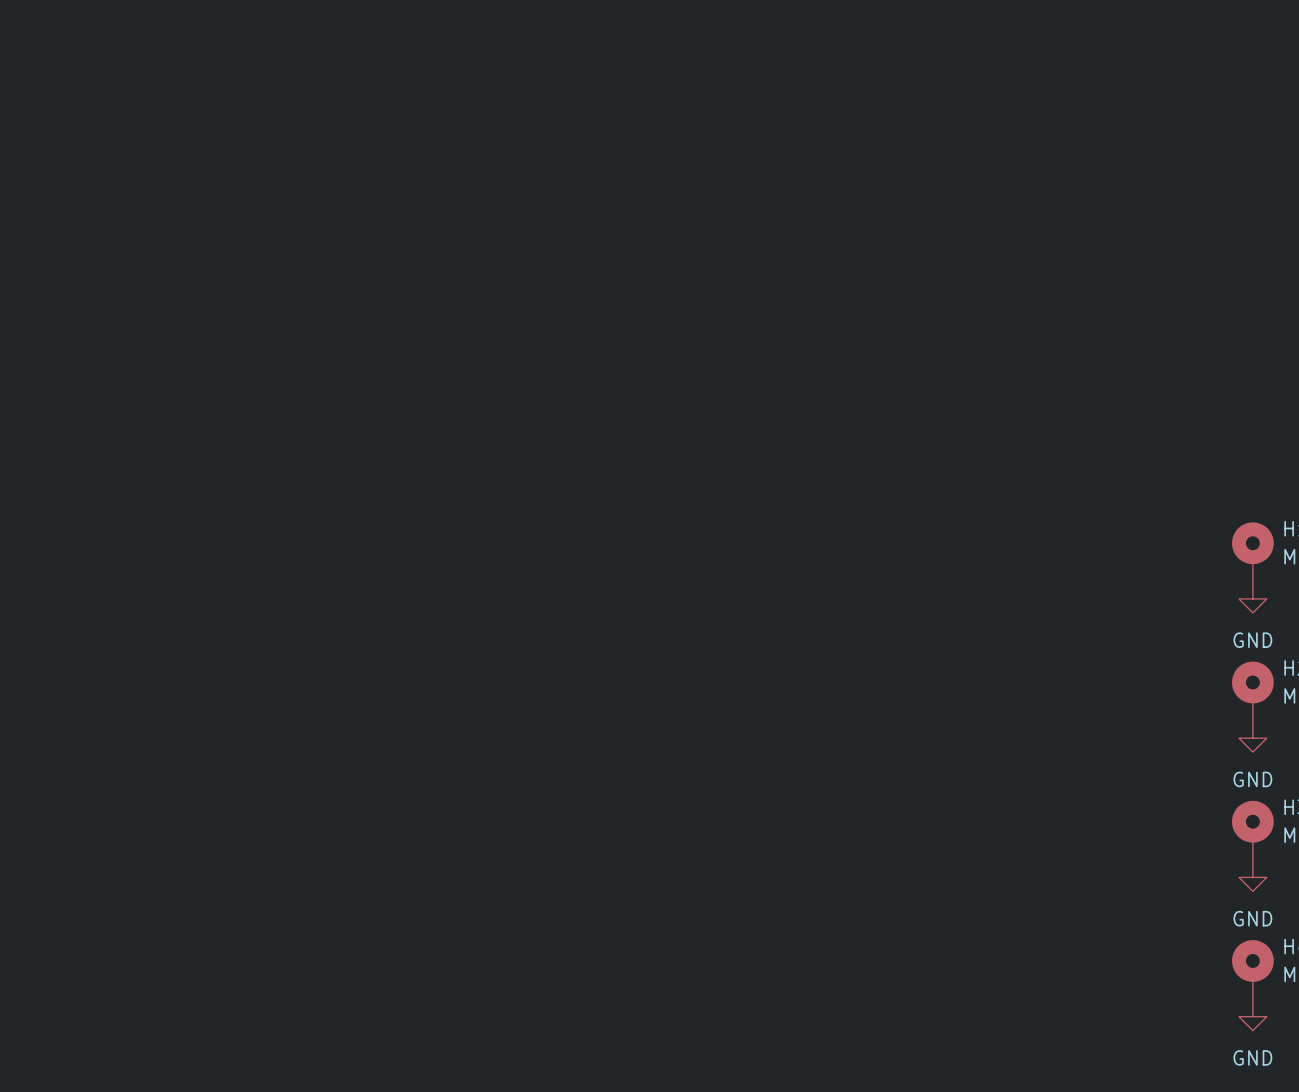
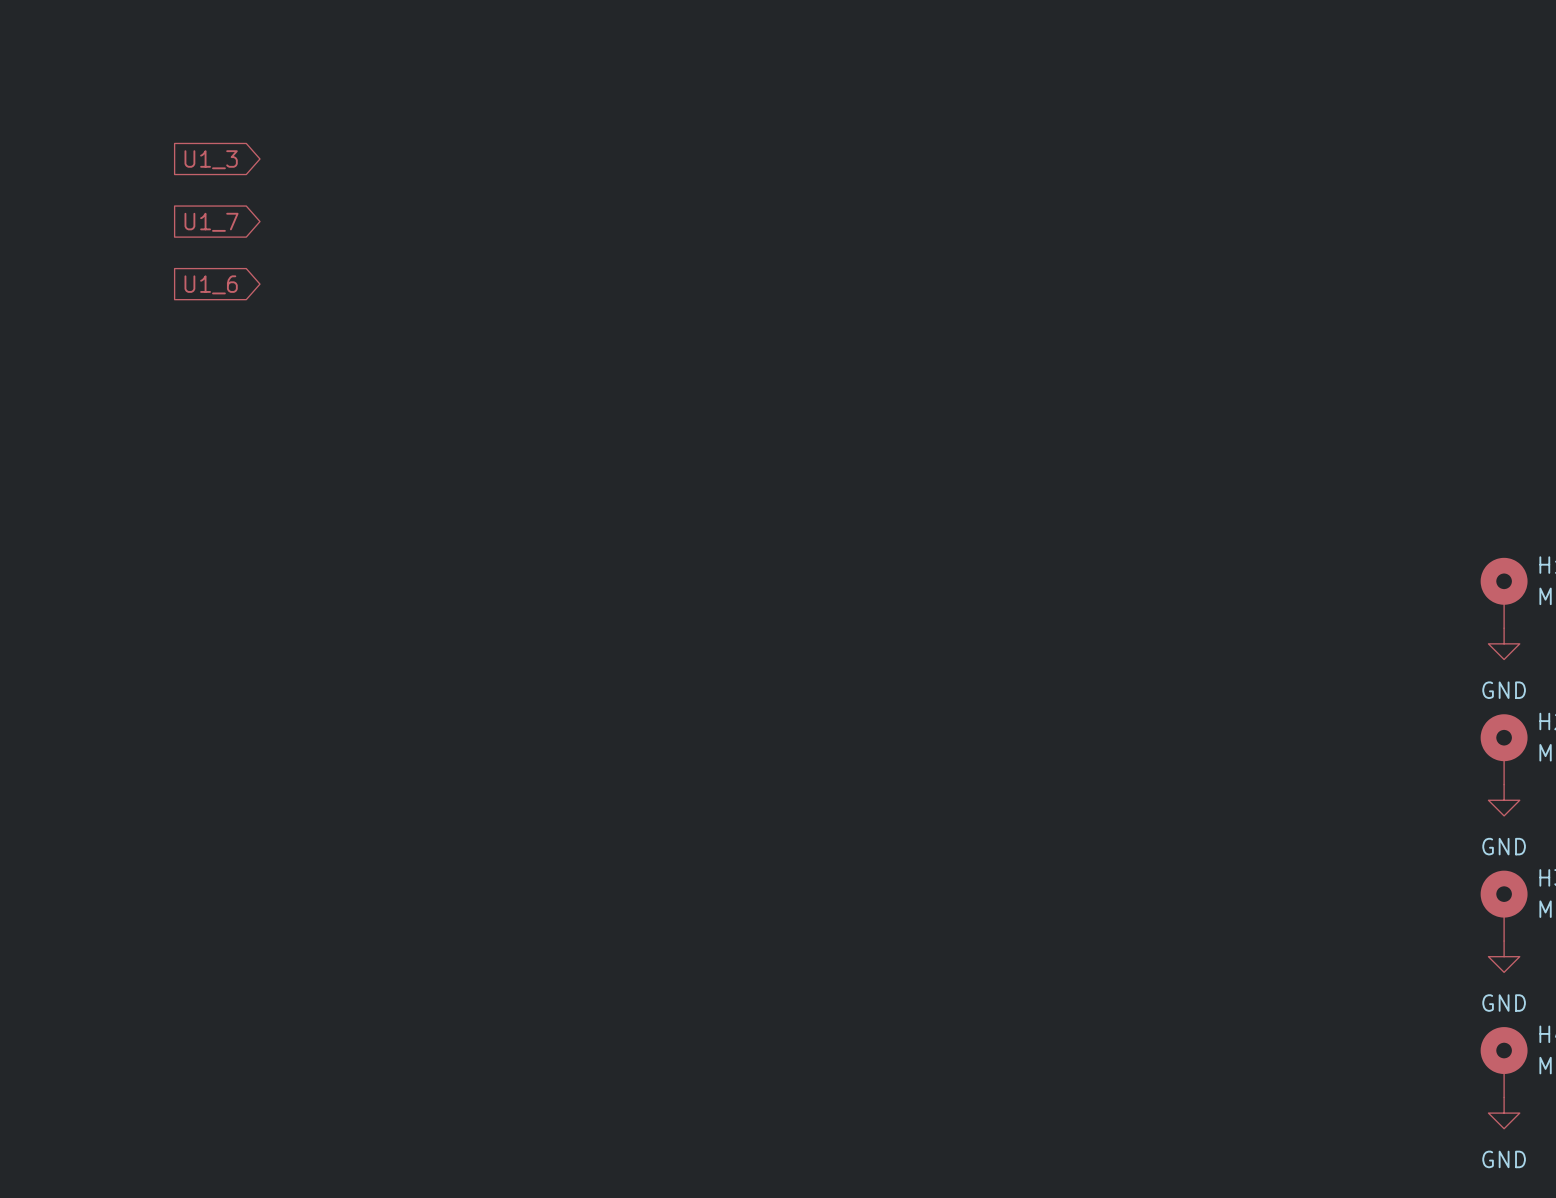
global label: none -> U1_3 (211, 159)
global label: none -> U1_7 (211, 222)
global label: none -> U1_6 (211, 284)

